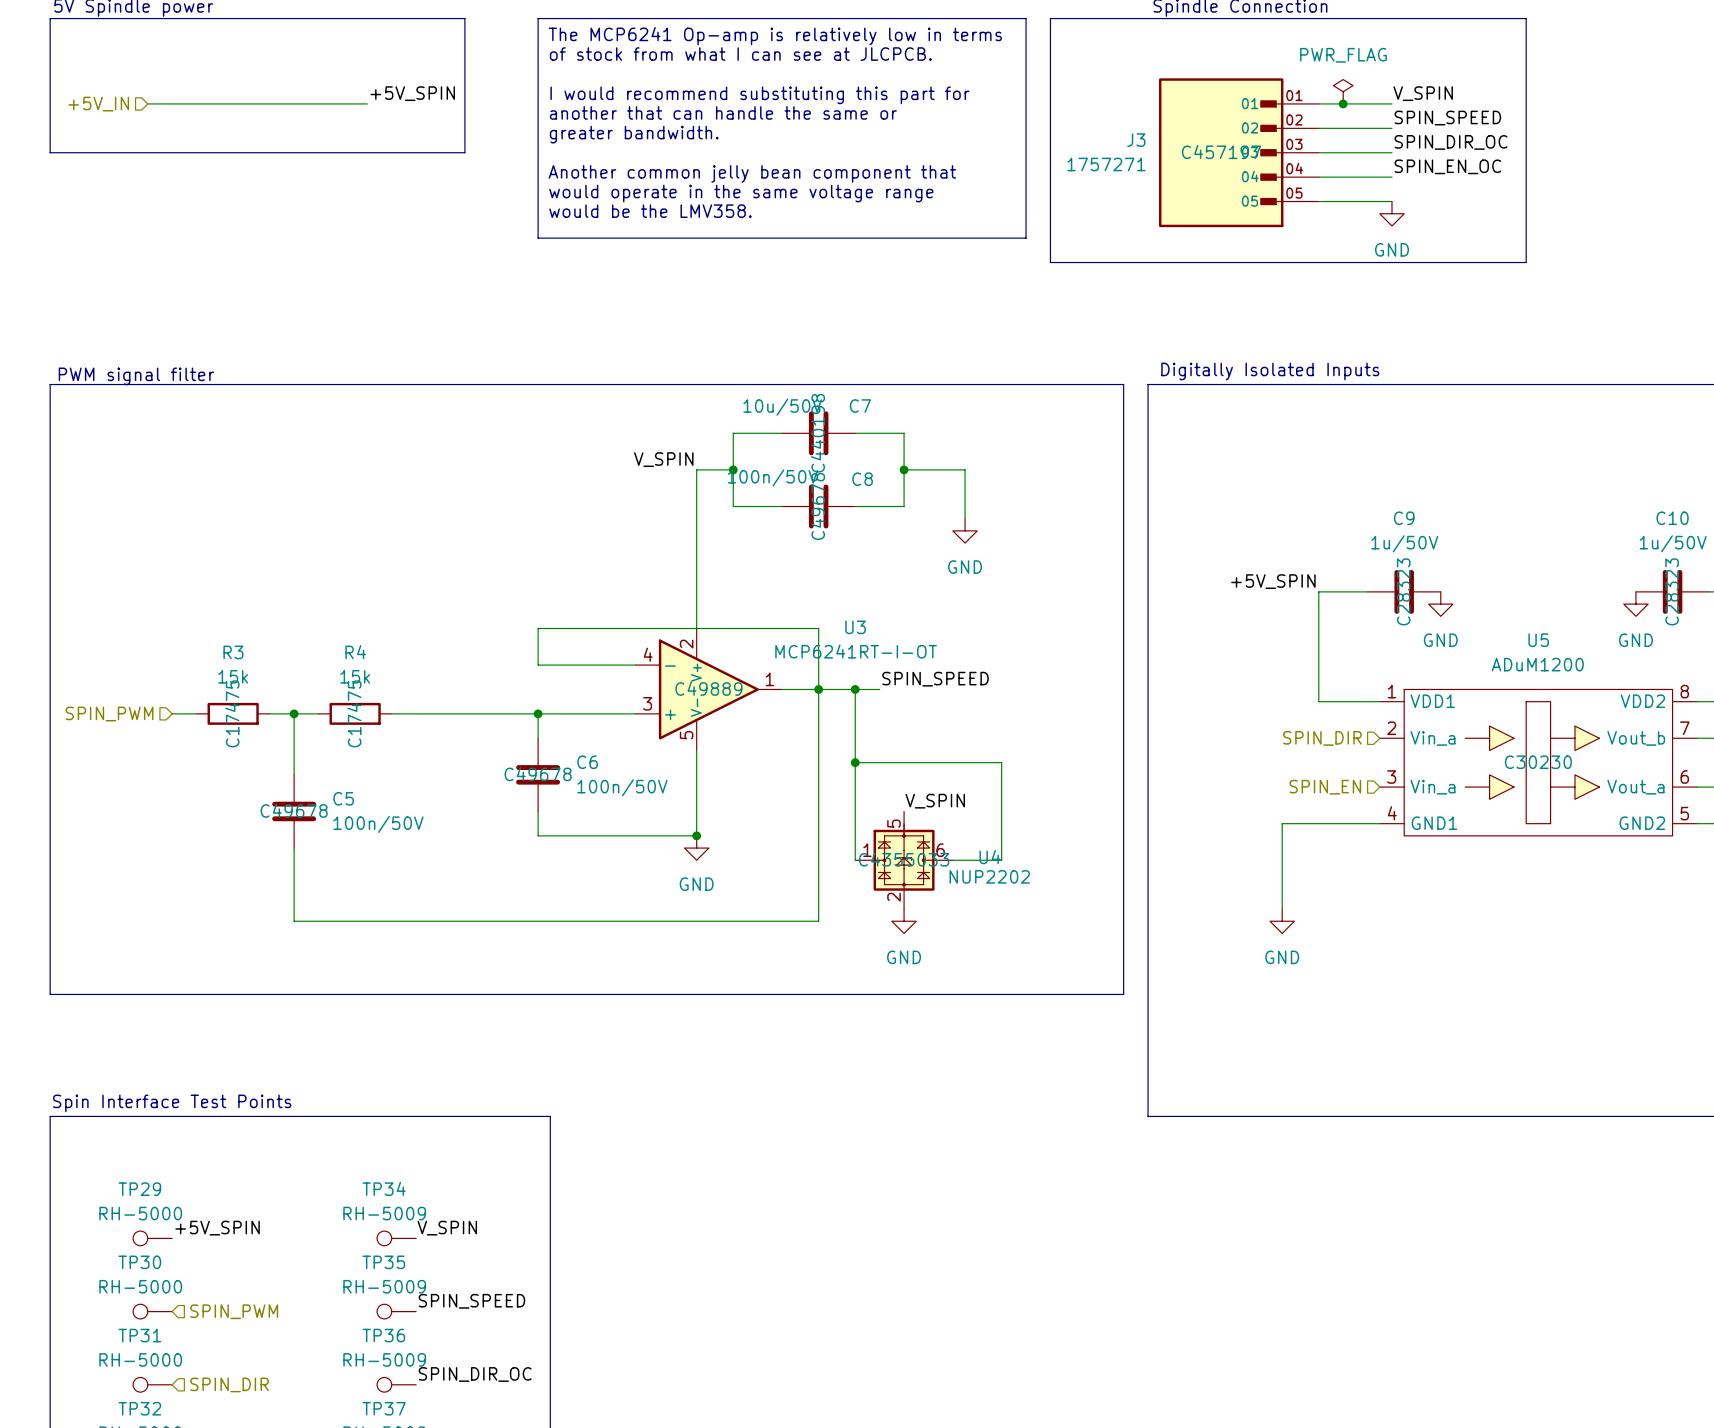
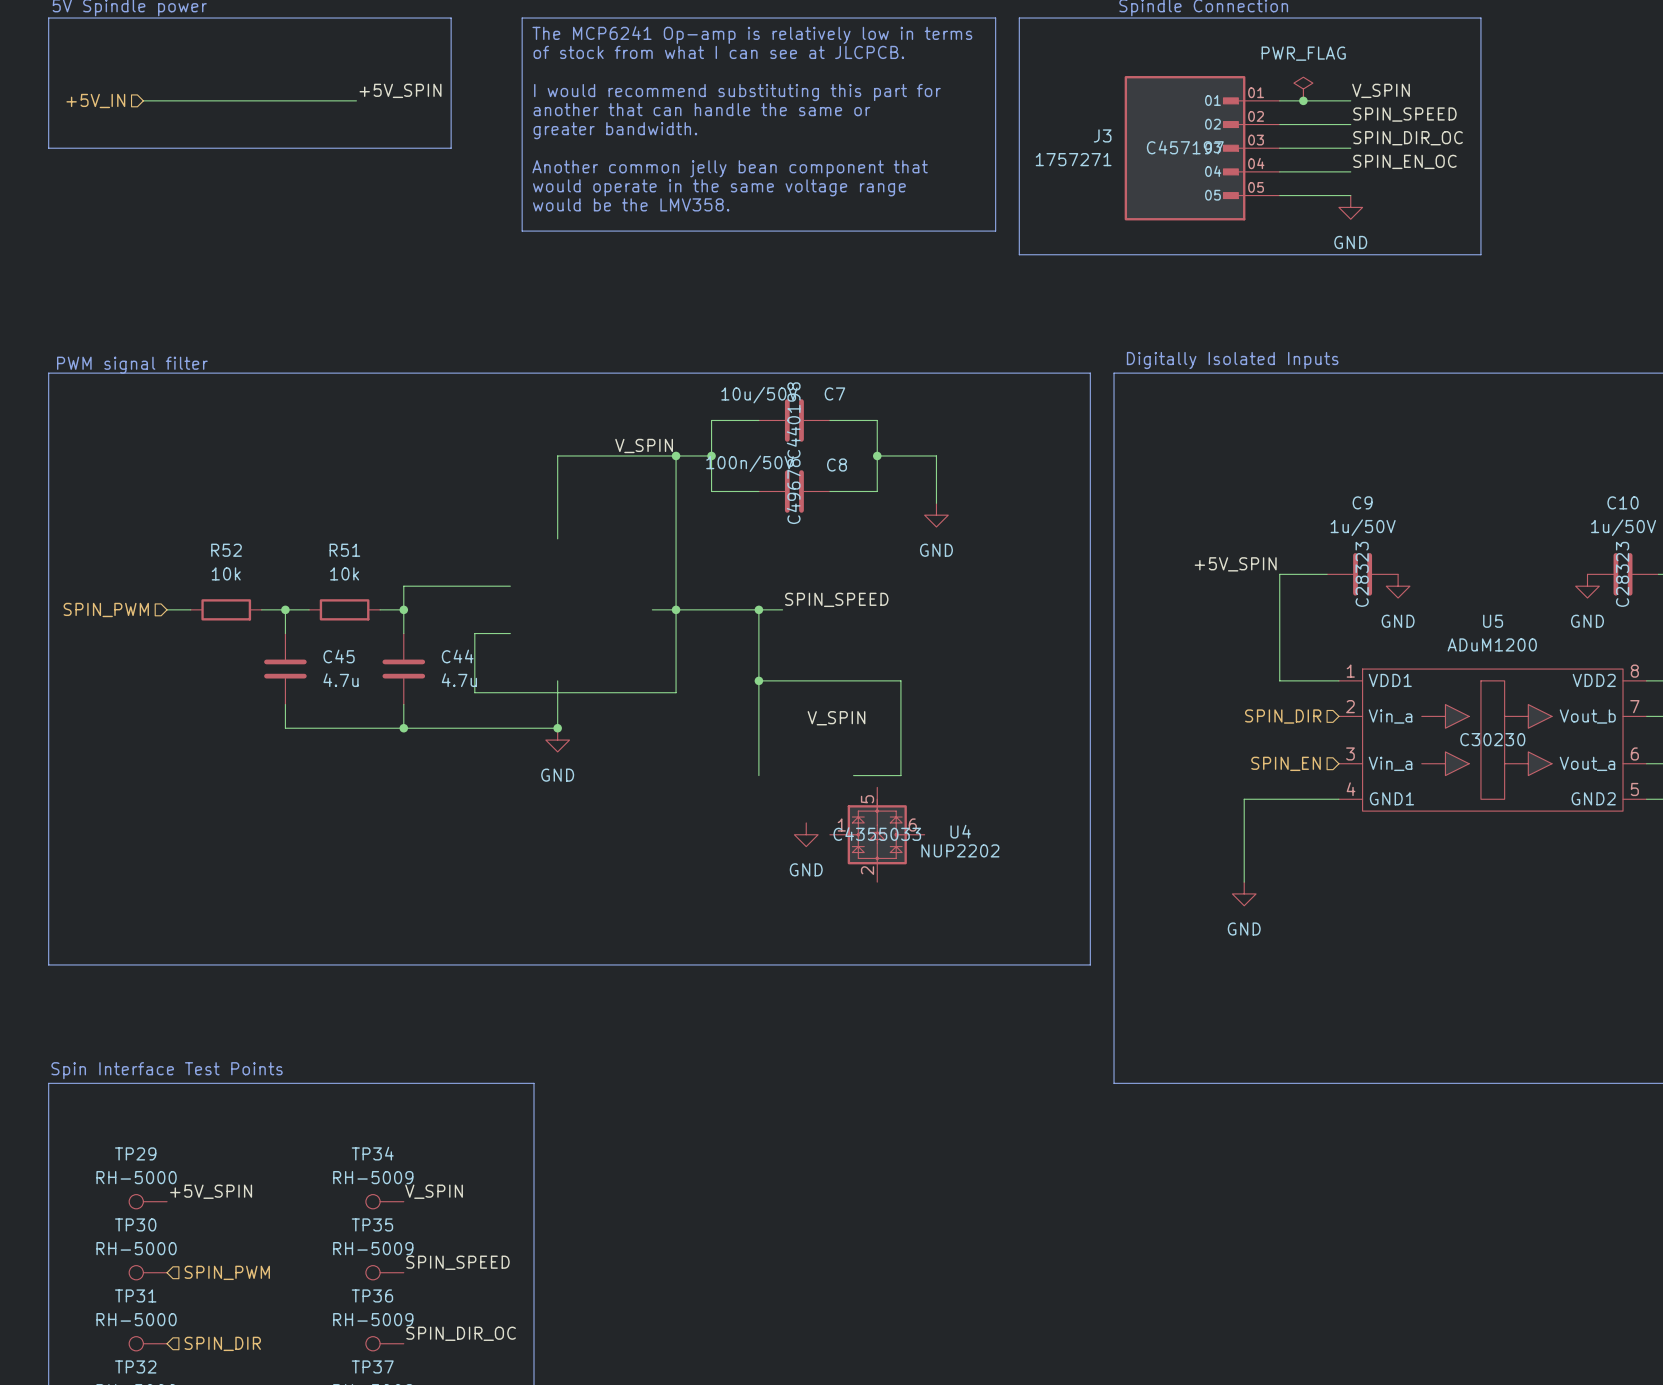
wire: none -> (676, 455) (557, 455) (557, 538)
junction: none -> (676, 455)
wire: none -> (510, 586) (403, 586) (403, 633)
R52: none -> 10k (226, 609)
wire: none -> (285, 609) (285, 633)
junction: none -> (285, 609)
R51: none -> 10k (344, 609)
wire: none -> (380, 609) (403, 609)
junction: none -> (403, 609)
wire: (672, 628) (538, 628) (538, 665) (635, 665) -> none
junction: none -> (676, 609)
junction: none -> (758, 609)
wire: (806, 628) (818, 628) (818, 921) (294, 921) (294, 848) -> none
label position: SPIN_SPEED (935, 679) -> SPIN_SPEED (836, 599)
C45: none -> 4.7u (285, 669)
C44: none -> 4.7u (403, 669)
U3: MCP6241RT-I-OT (708, 689) -> none
wire: (782, 689) (879, 689) -> none
junction: (818, 689) -> none
wire: (855, 689) (855, 860) -> (758, 609) (758, 775)
junction: (855, 689) -> none
junction: none -> (758, 680)
wire: (172, 713) (196, 713) -> (167, 609) (190, 609)
R3: 15k (233, 713) -> none
wire: (269, 713) (318, 713) -> (261, 609) (309, 609)
junction: (294, 713) -> none
R4: 15k (355, 713) -> none
wire: (391, 713) (489, 713) -> (510, 633) (474, 633) (474, 692)
wire: (538, 713) (538, 738) -> (403, 704) (403, 728)
junction position: (538, 713) -> (557, 728)
hierarchical label position: SPIN_PWM (109, 714) -> SPIN_PWM (106, 609)
wire: (294, 750) (294, 774) -> (285, 728) (557, 728) (557, 680)
junction: none -> (403, 728)
wire: (696, 750) (696, 835) (538, 835) (538, 811) -> none
power symbol: none -> GND (557, 740)
wire: (855, 762) (1001, 762) (1001, 860) (952, 860) -> (758, 680) (900, 680) (900, 775) (853, 775)
junction: (855, 762) -> none
C6: 100n/50V (538, 774) -> none
label position: V_SPIN (935, 801) -> V_SPIN (836, 718)
C5: 100n/50V (294, 811) -> none
junction: (696, 835) -> none
power symbol: GND (696, 848) -> none
power symbol: none -> GND (806, 834)
power symbol: GND (904, 921) -> none

